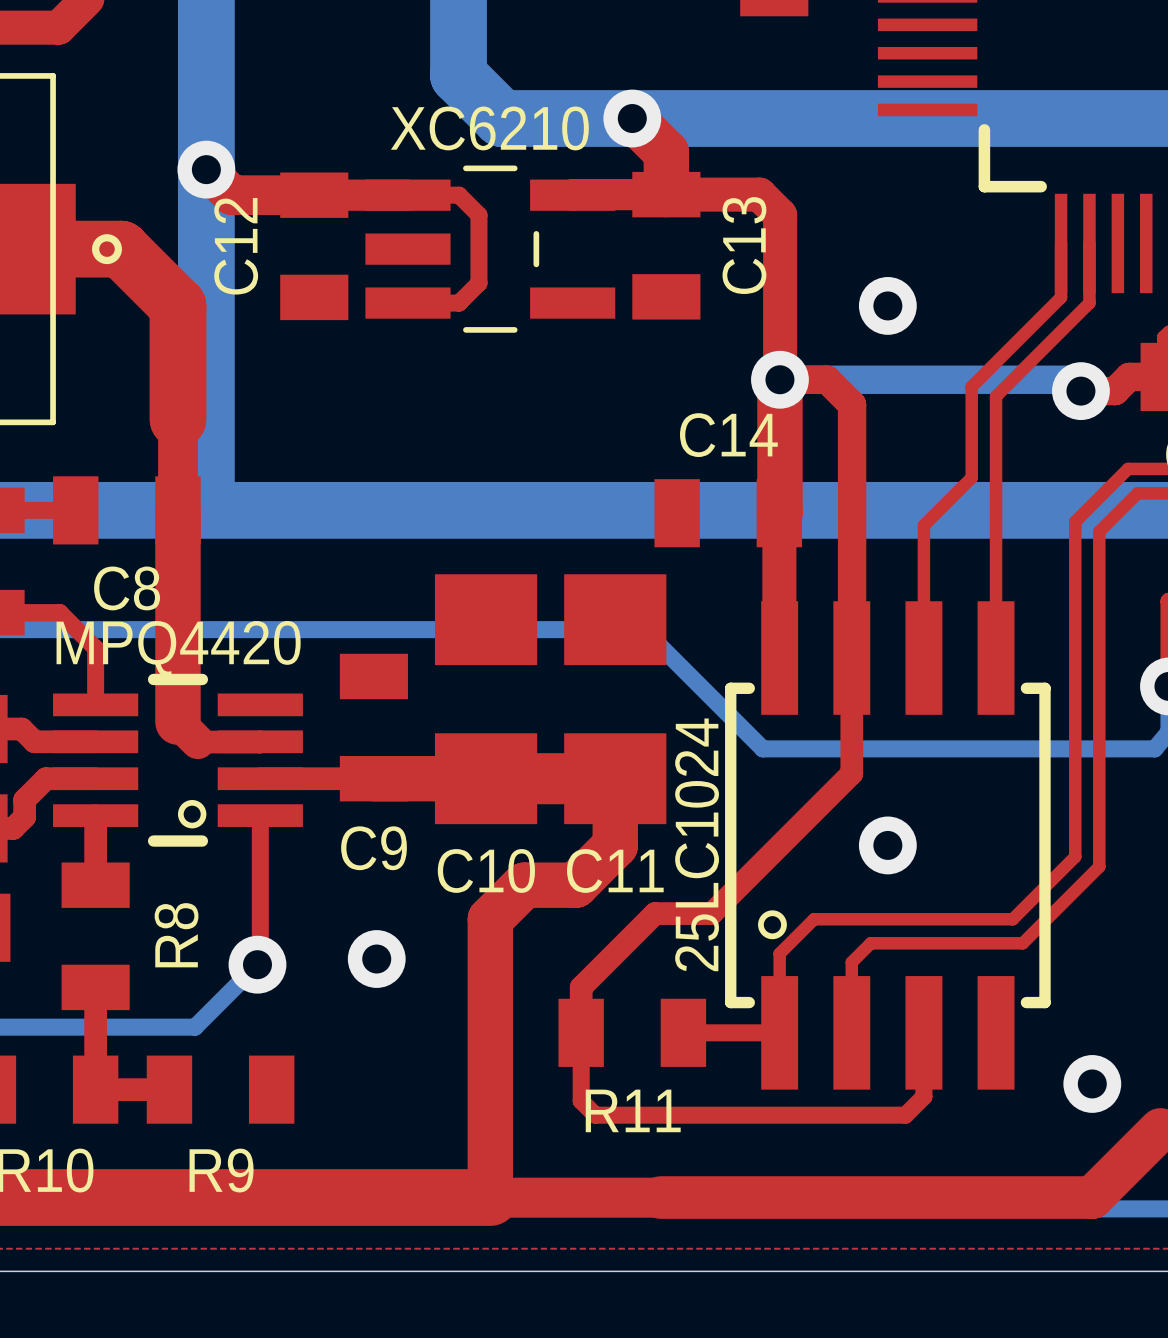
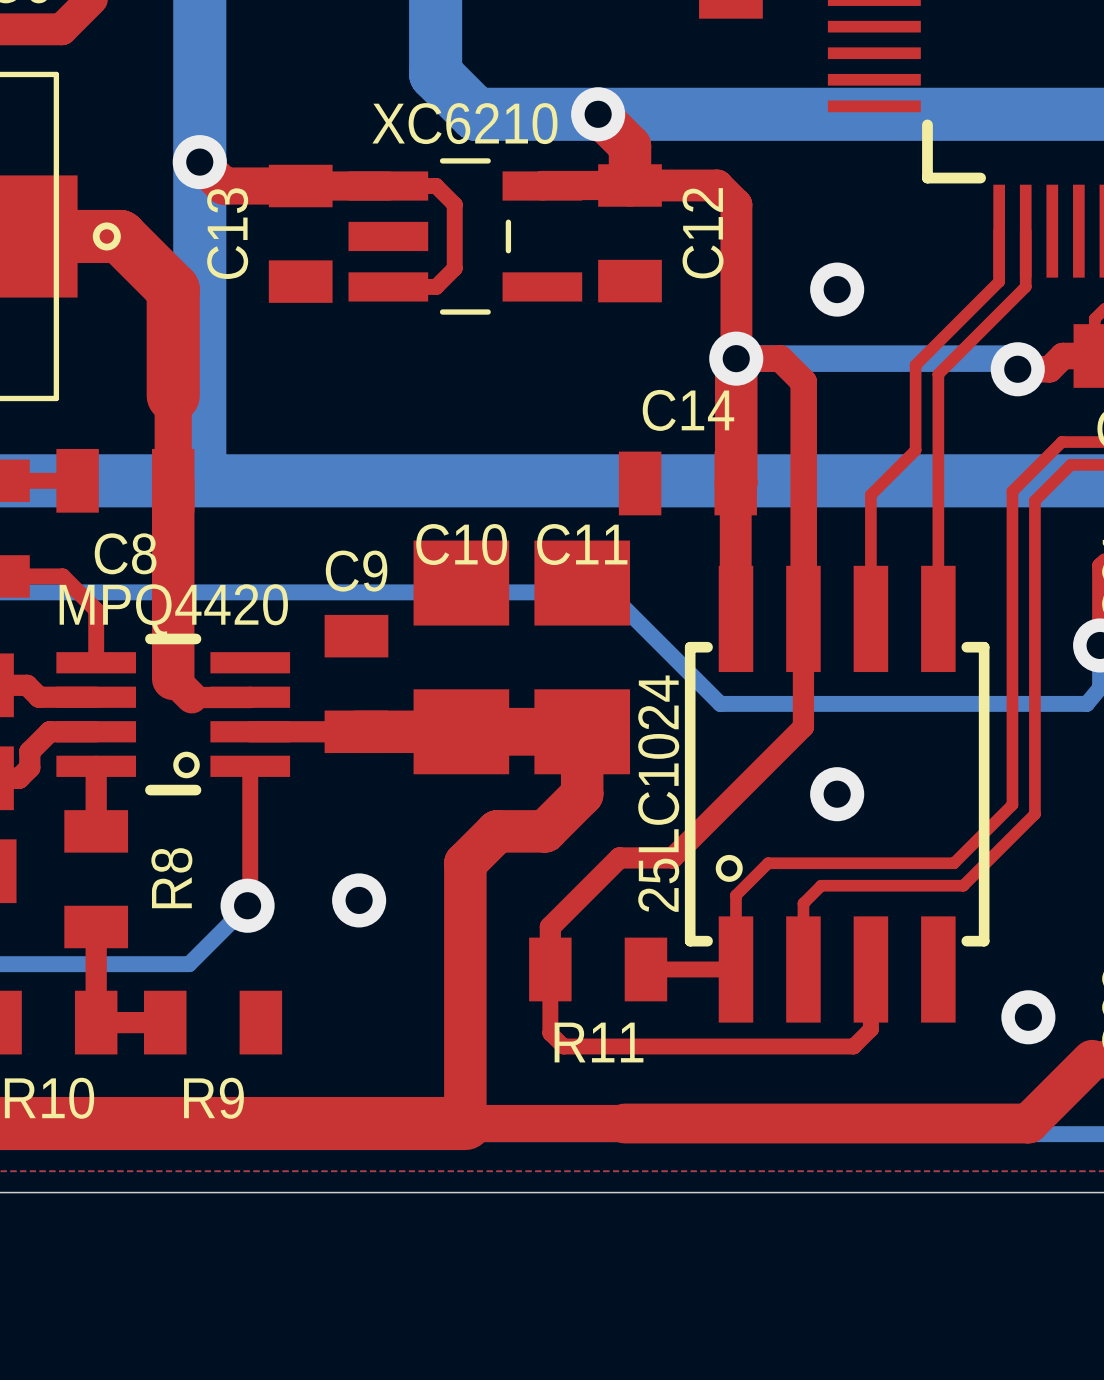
C13 name: C13 (744, 245) -> C12 (703, 233)
C12 name: C12 (236, 246) -> C13 (227, 233)
C9 name position: C9 (374, 848) -> C9 (356, 571)
C10 name position: C10 (486, 870) -> C10 (461, 544)
C11 name position: C11 (615, 870) -> C11 (582, 544)

